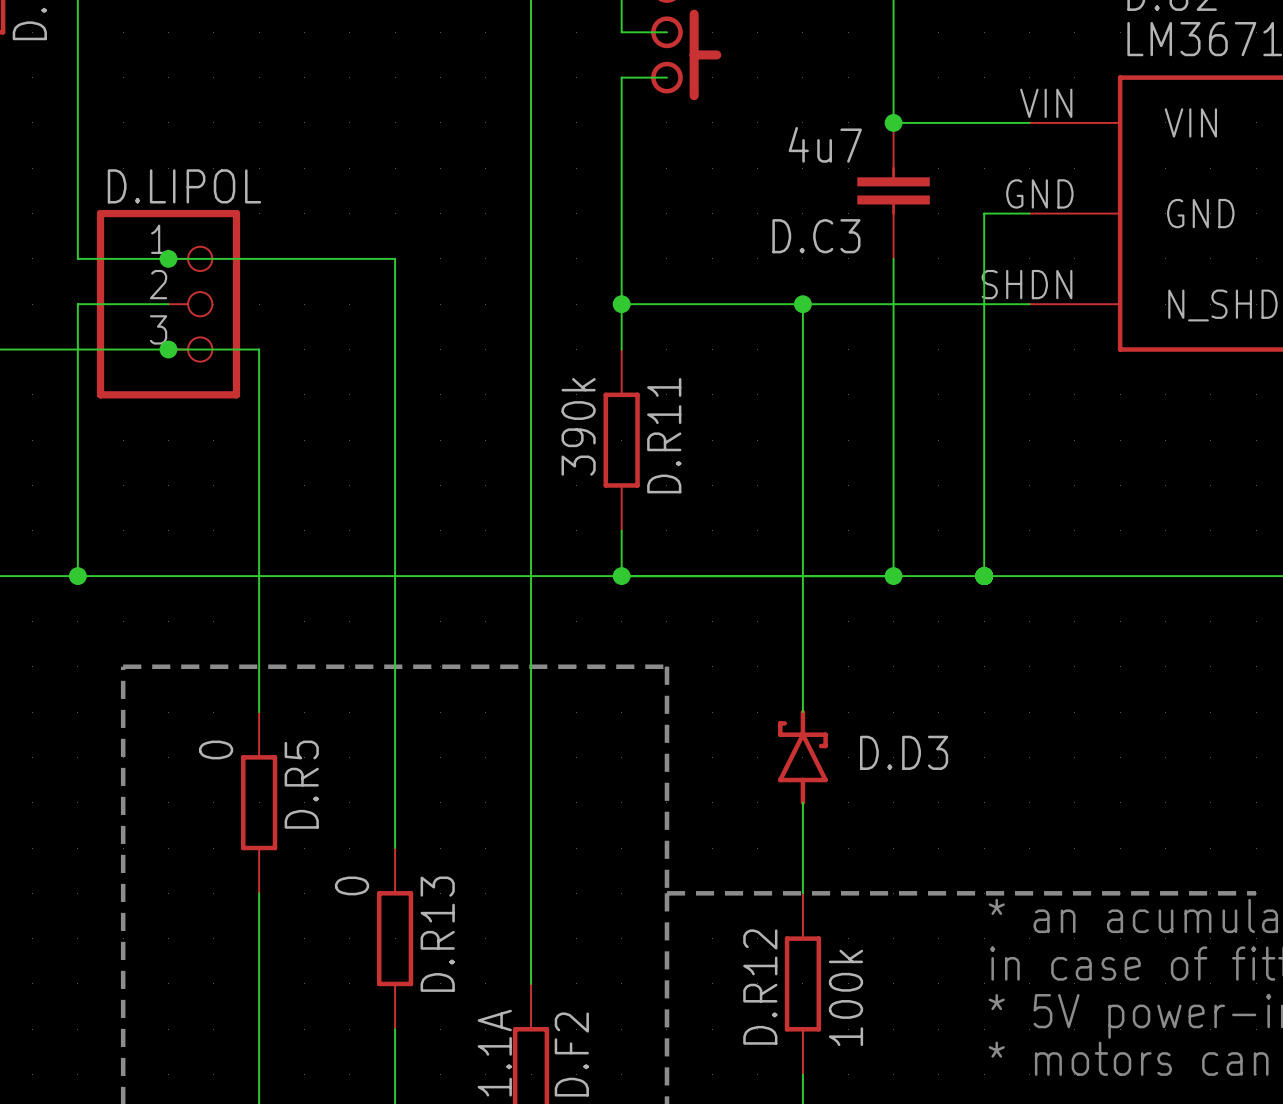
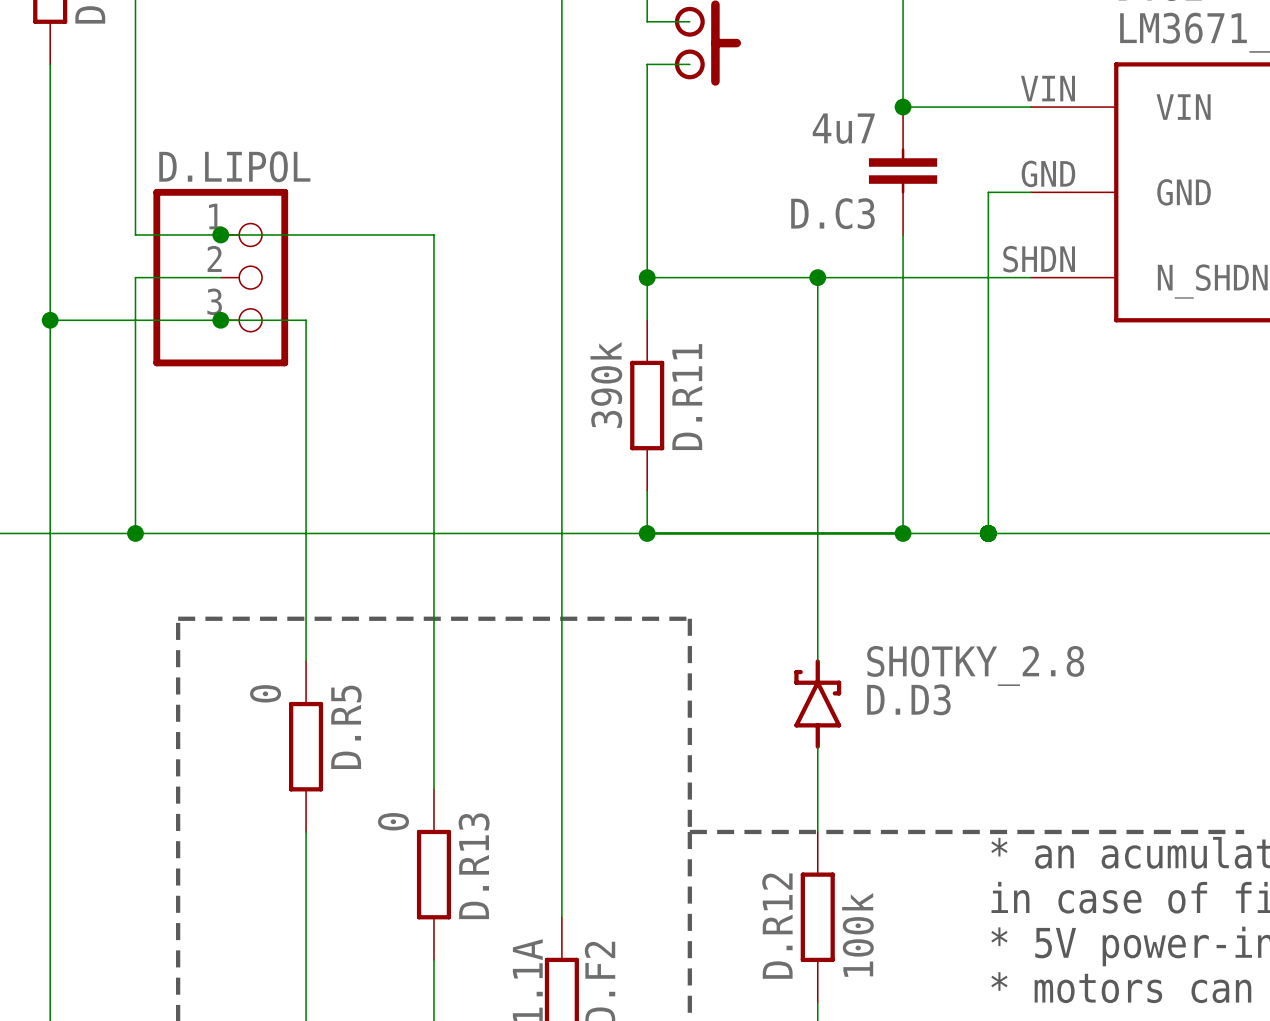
D.D3 value: none -> SHOTKY_2.8 (975, 665)

